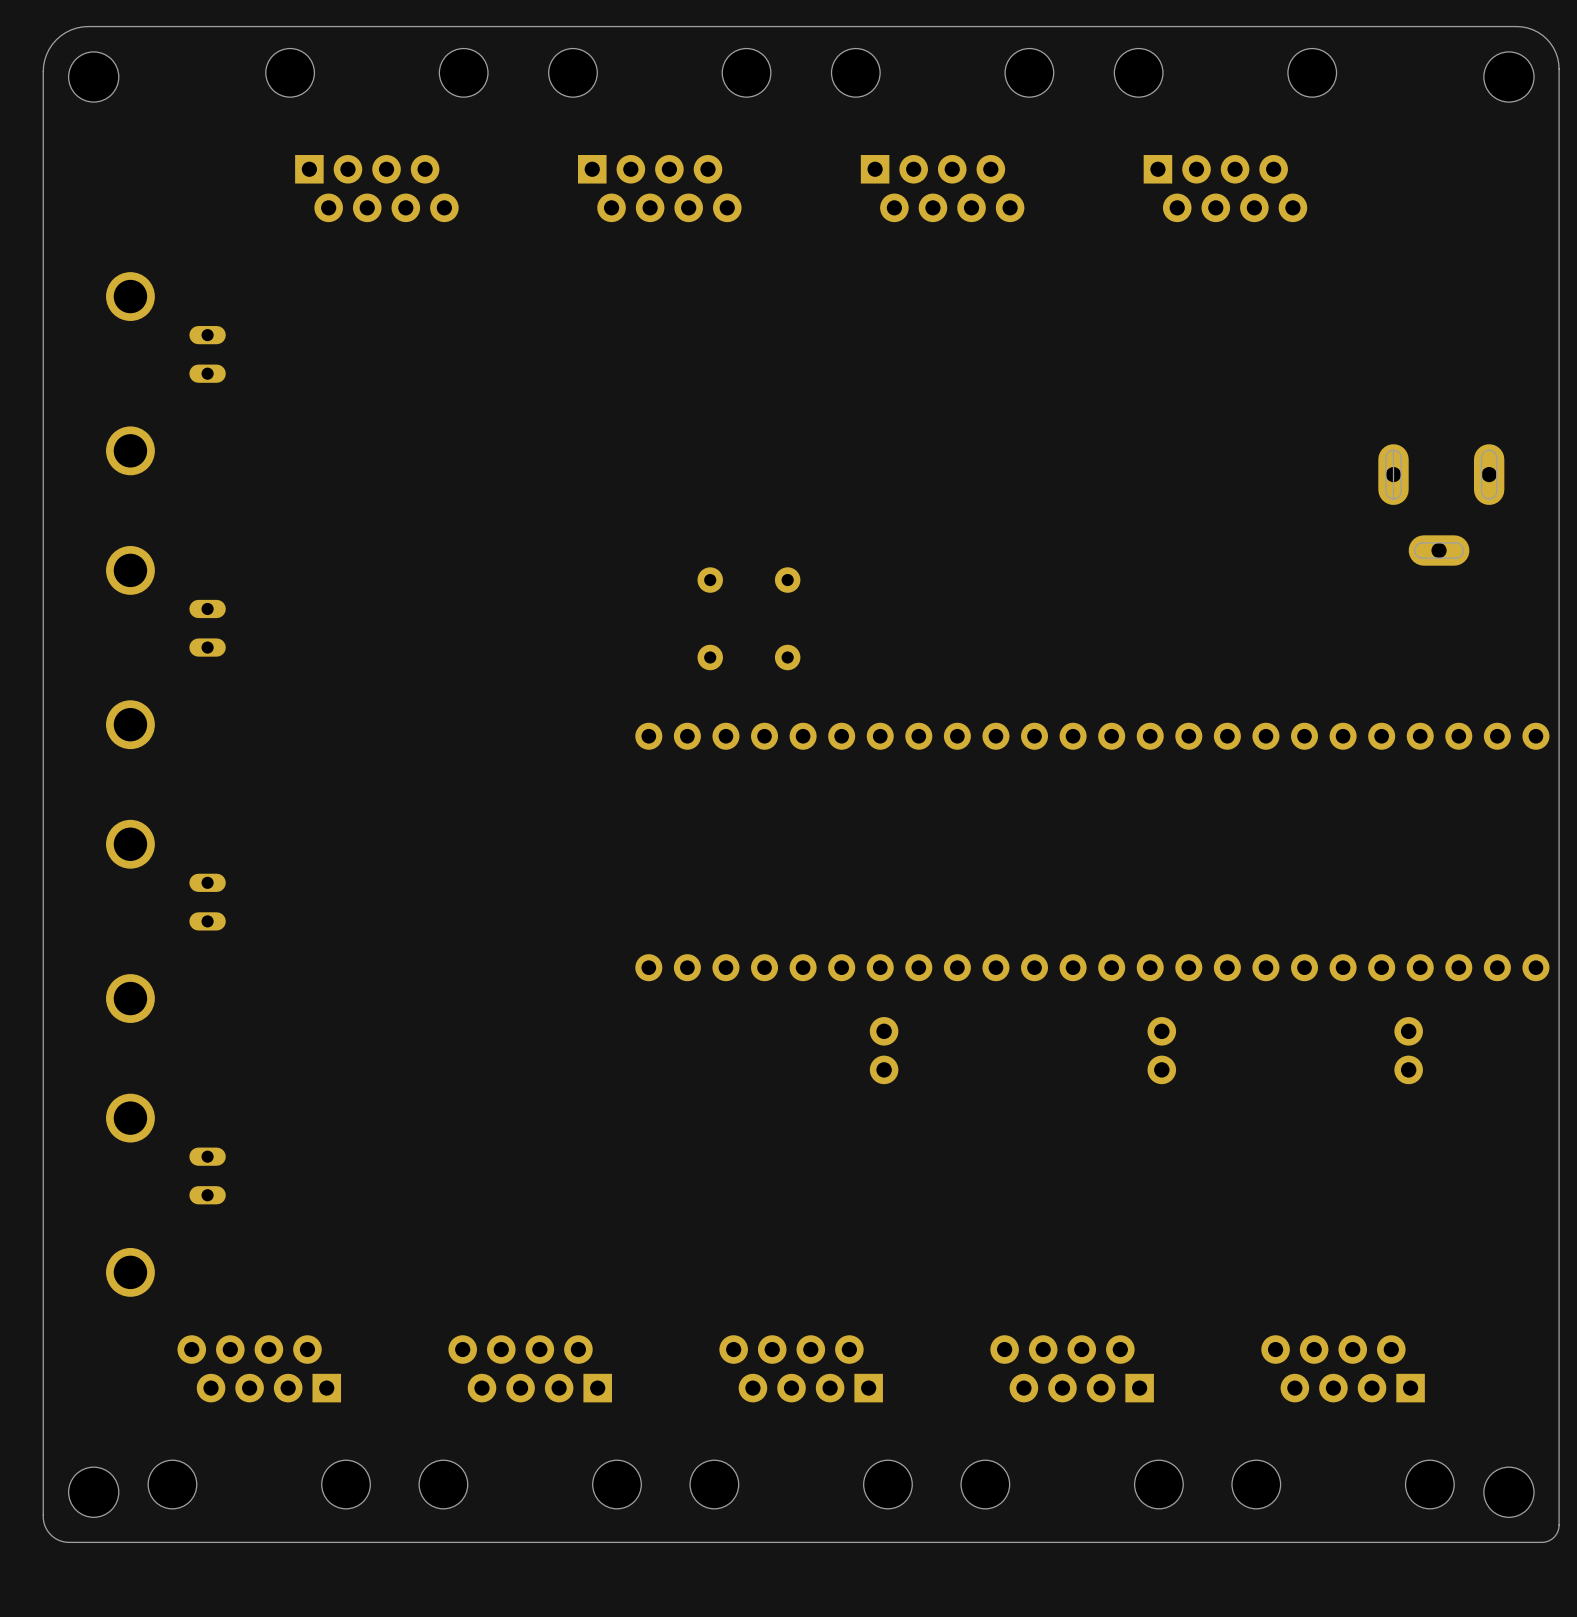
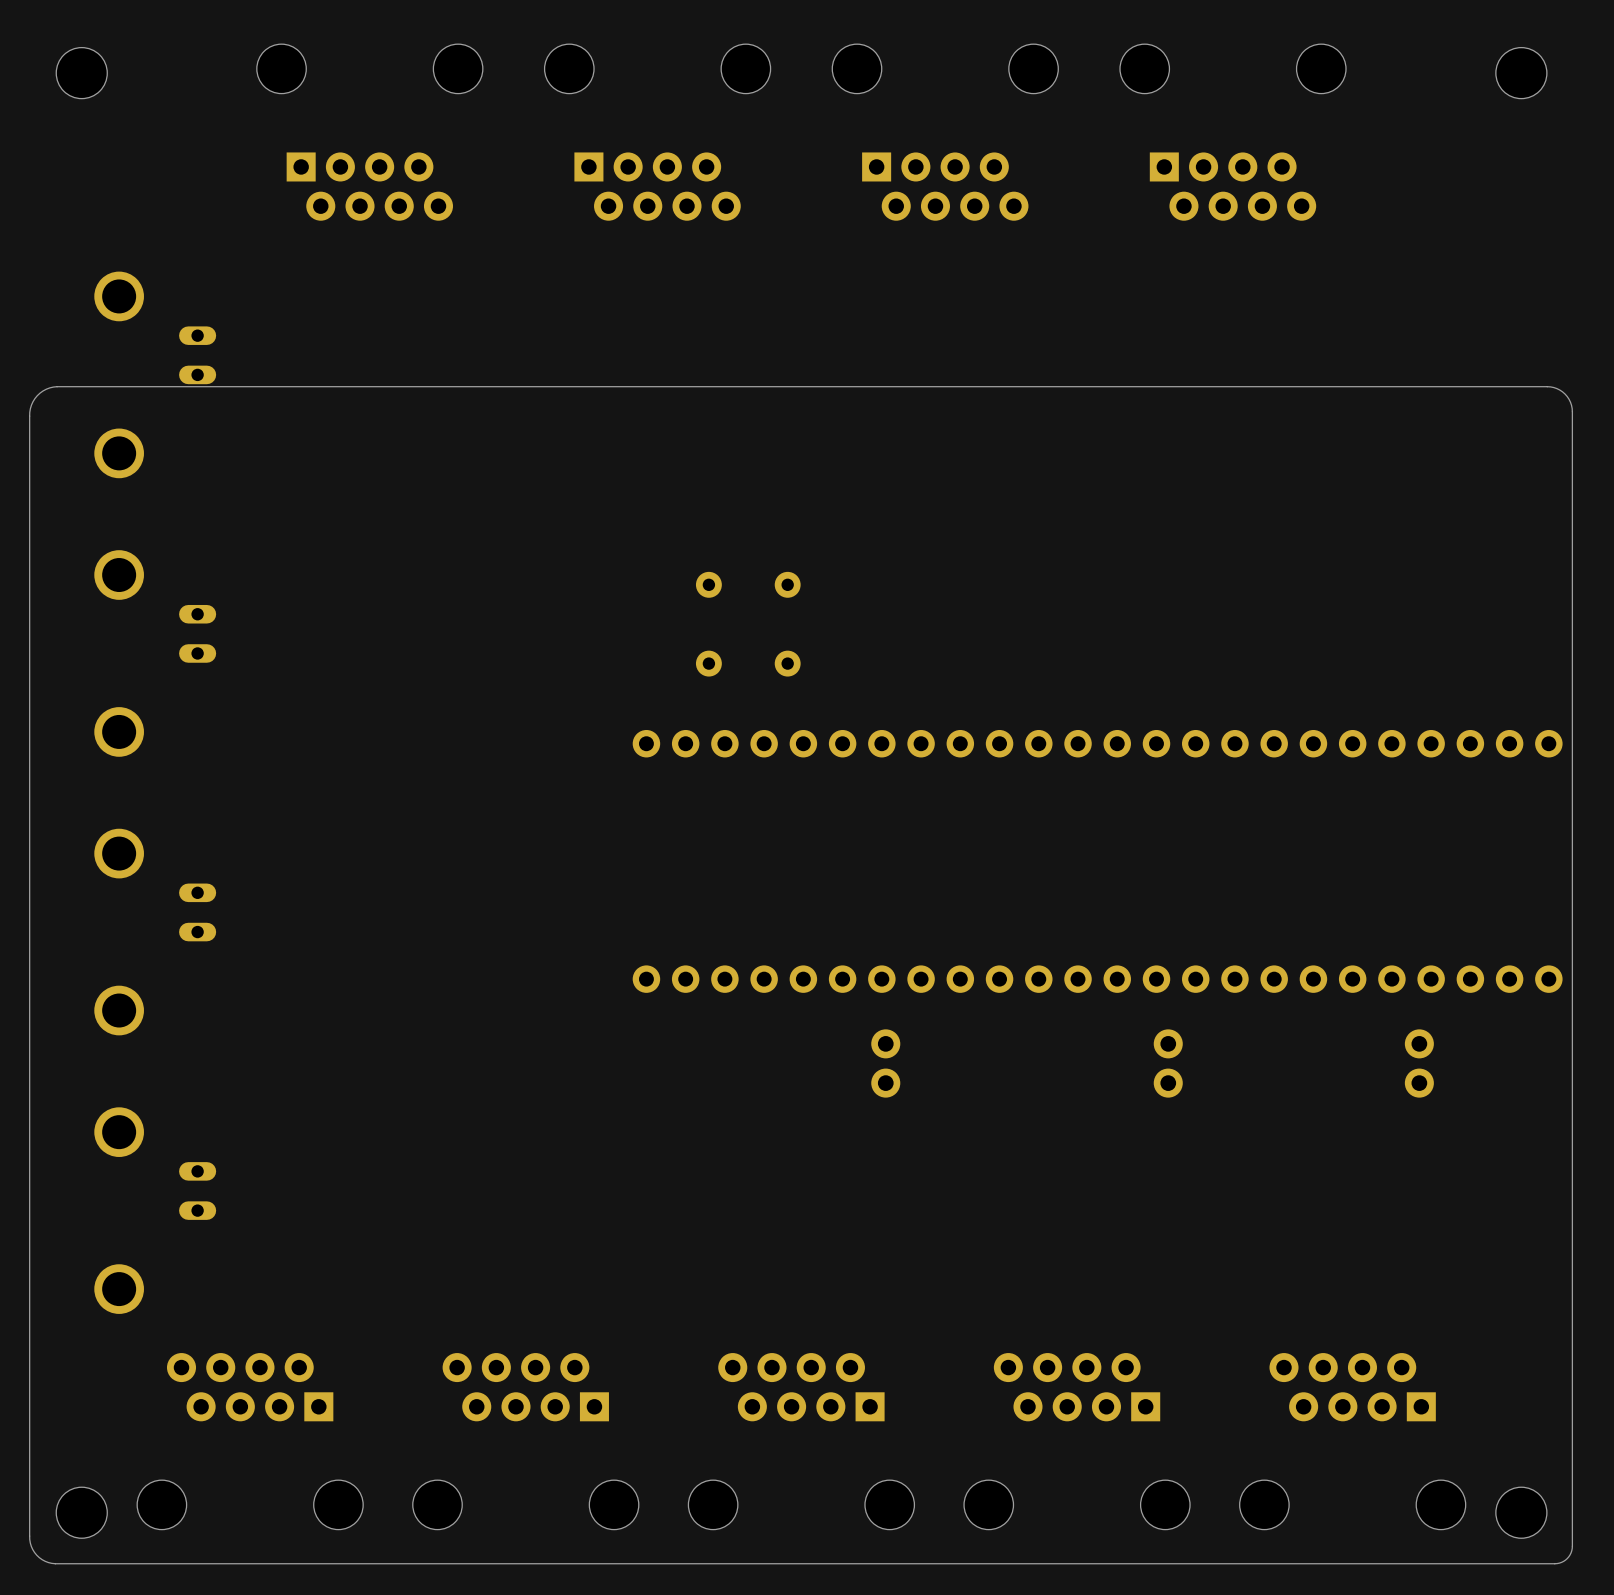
board edge: (1559, 409) (1558, 63) (1550, 43) (1542, 35) (1527, 28) (88, 26) (76, 28) (60, 35) (49, 49) (44, 59) (43, 71) (43, 1515) (44, 1525) (49, 1533) (57, 1539) (67, 1542) -> (1572, 411) (1570, 402) (1565, 394) (1556, 388) (1547, 386) (57, 386) (40, 393) (31, 405) (29, 416) (29, 1536) (31, 1546) (36, 1555) (45, 1561) (55, 1563)
part: (1441, 504) -> none

